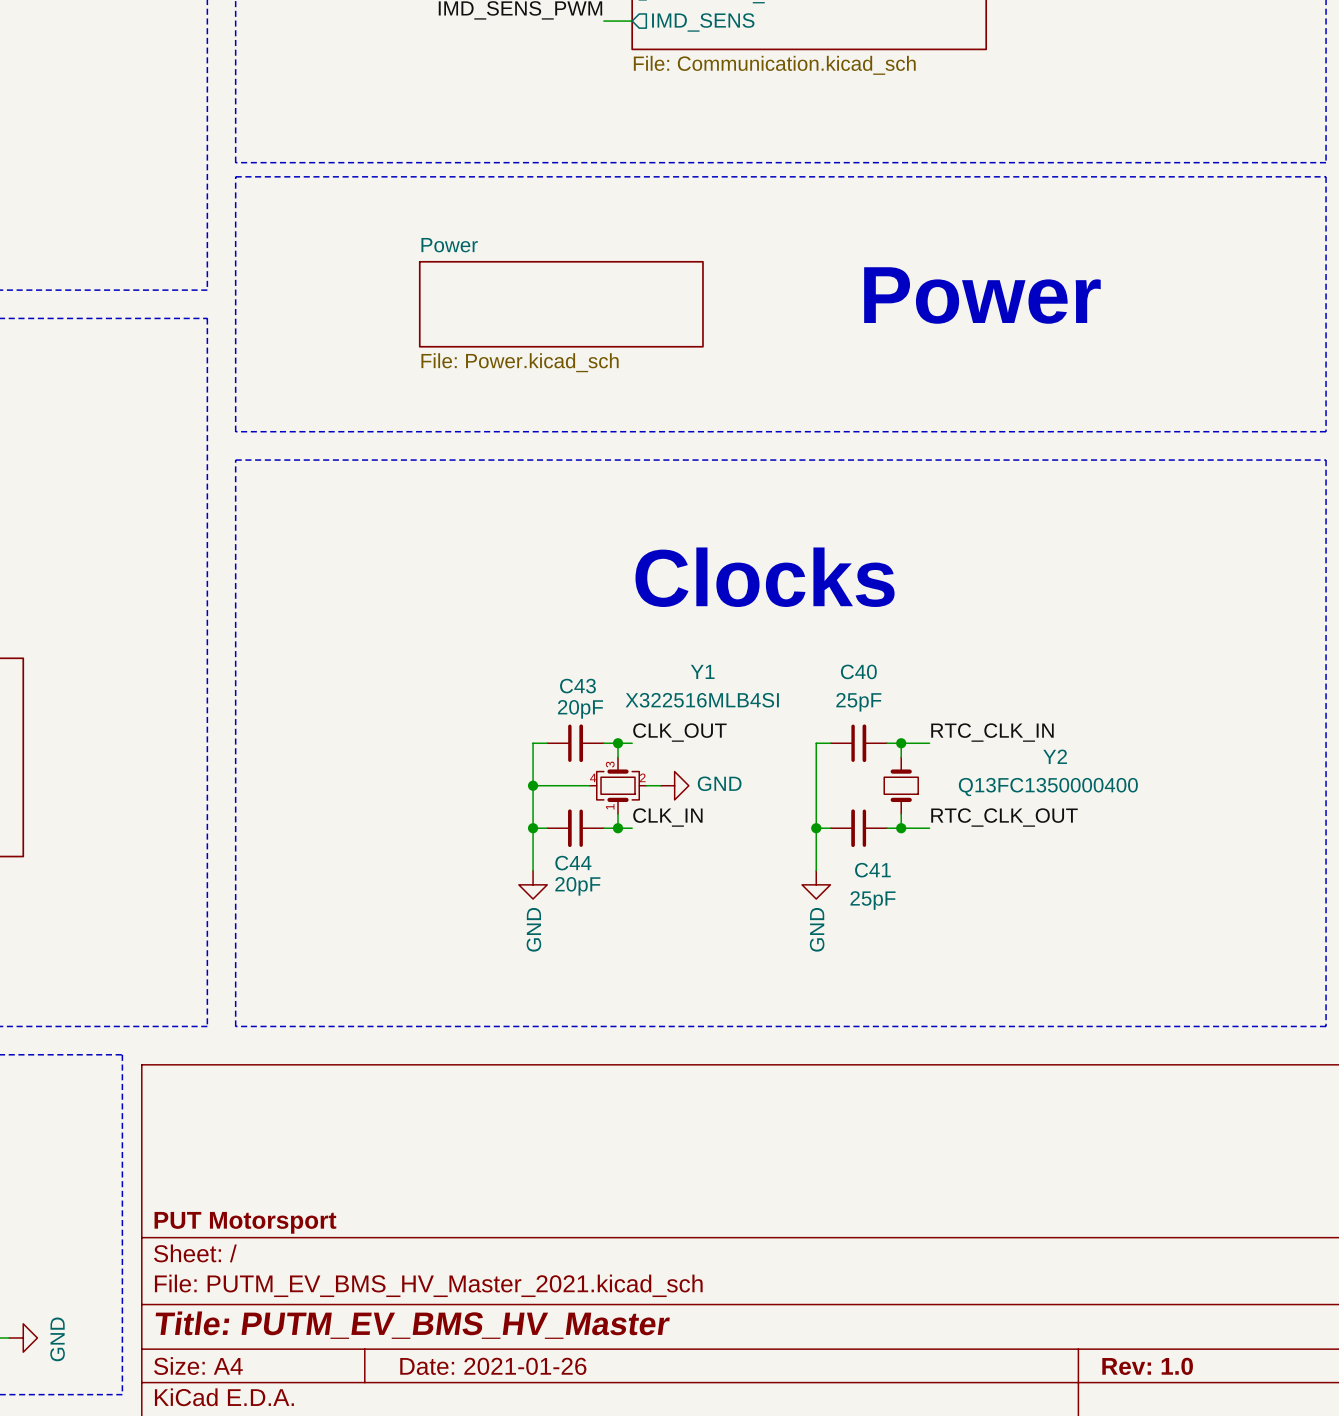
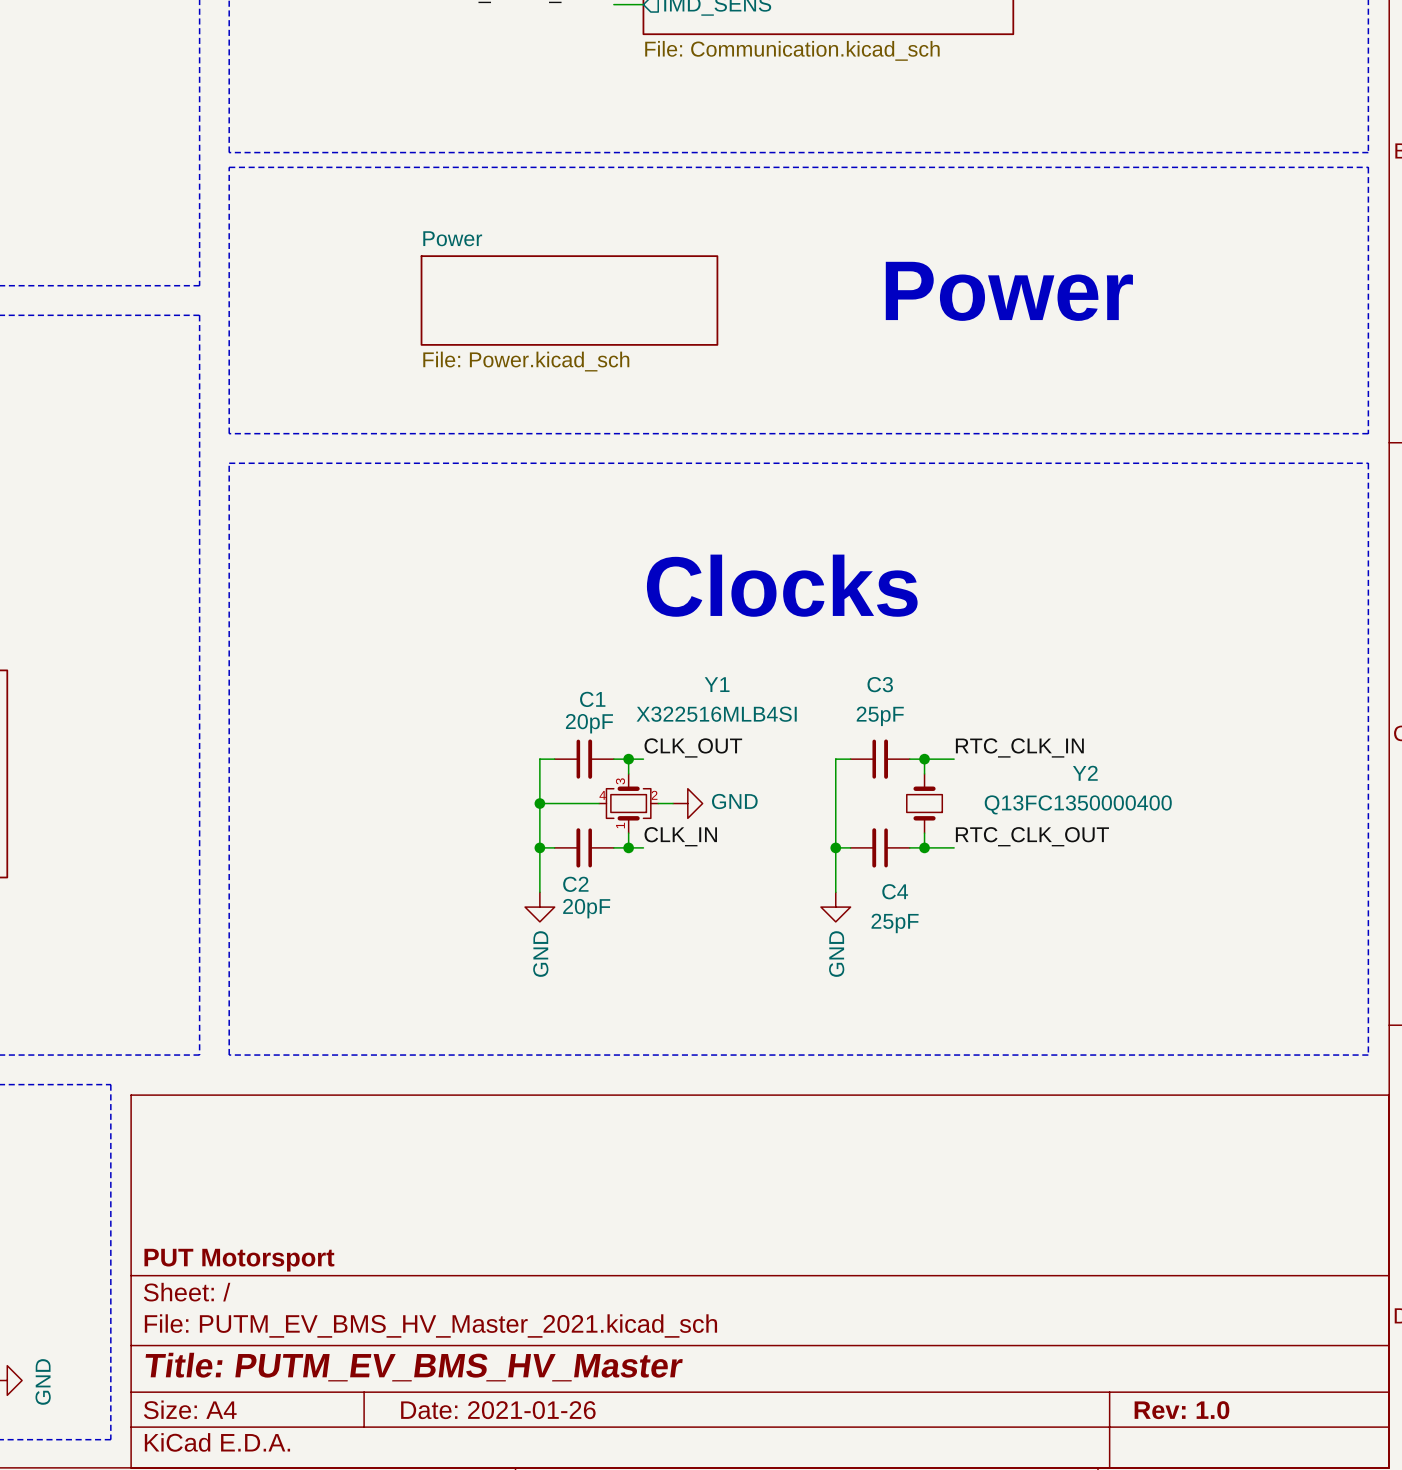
C40 name: C40 (858, 671) -> C3 (880, 684)
C43 name: C43 (577, 686) -> C1 (592, 699)
C44 name: C44 (573, 863) -> C2 (575, 884)
C41 name: C41 (872, 870) -> C4 (895, 891)

